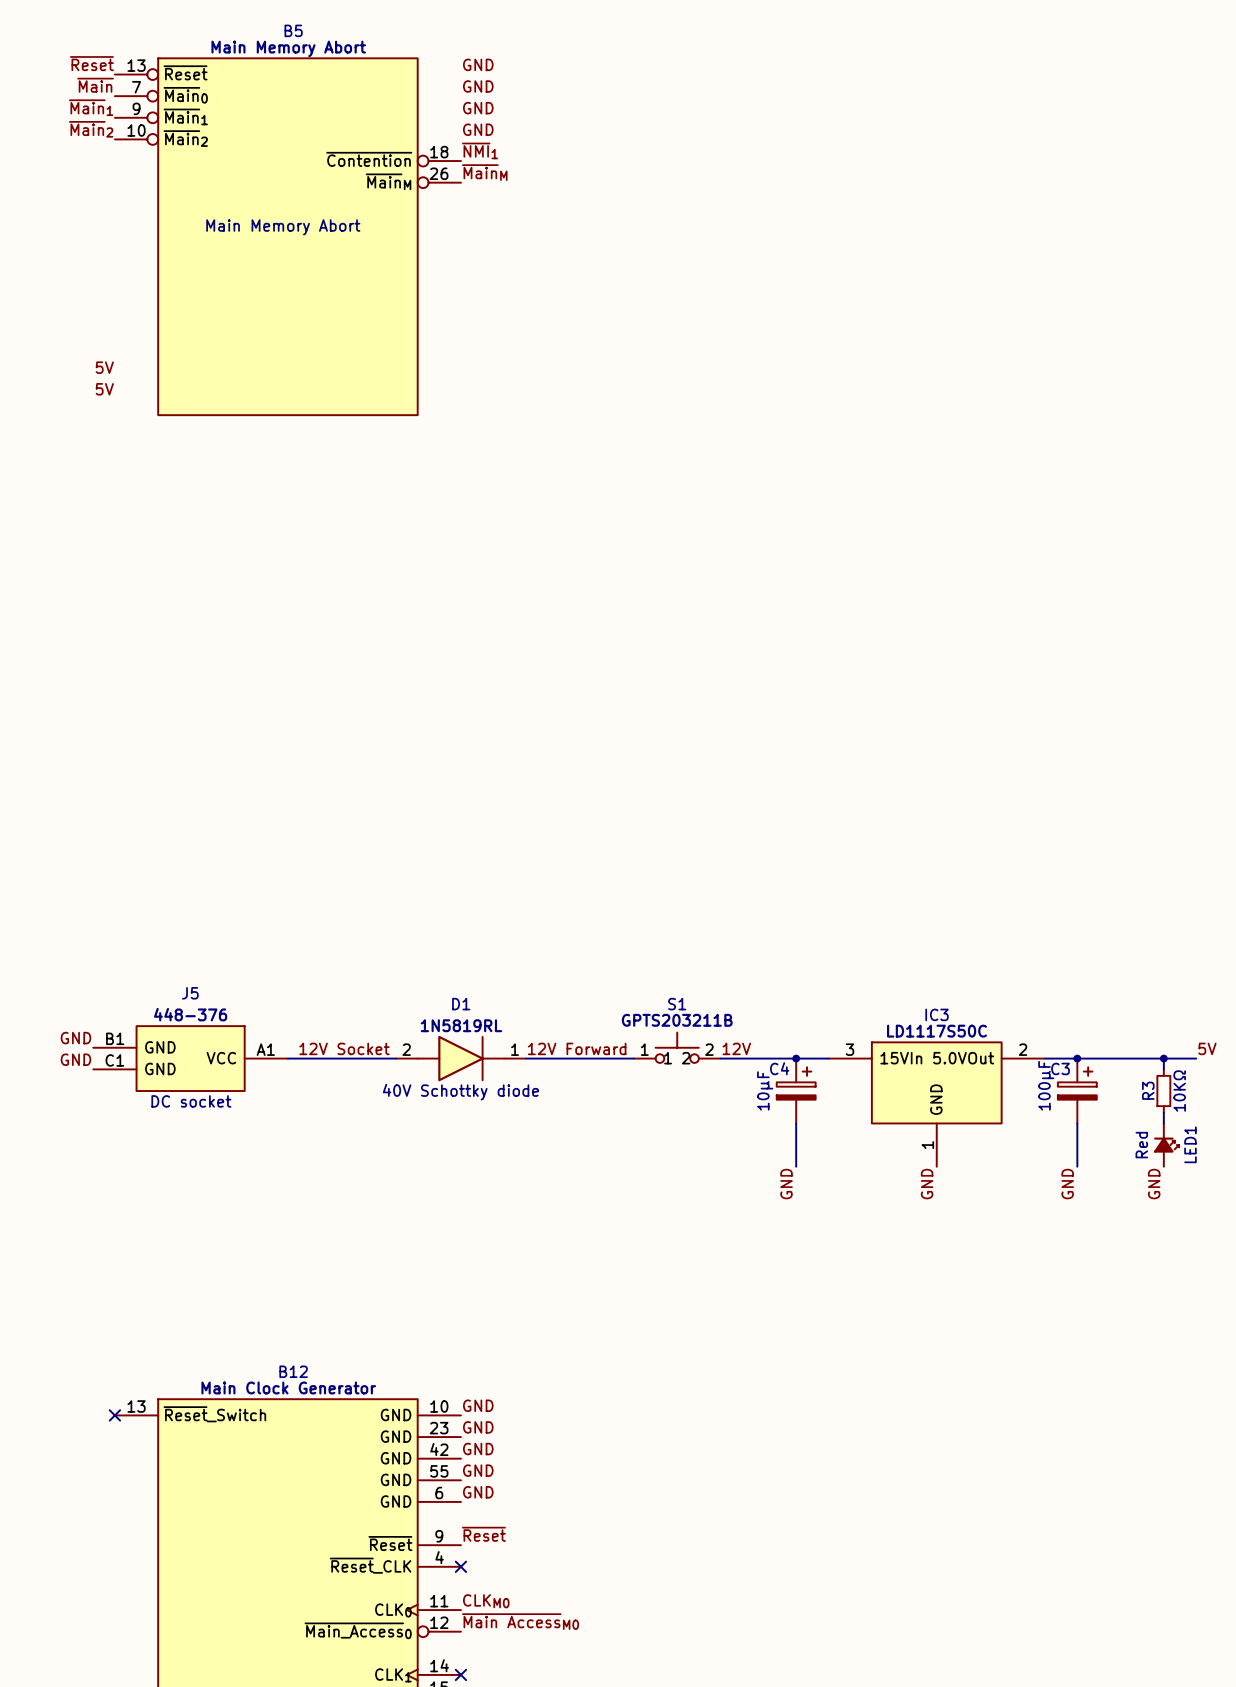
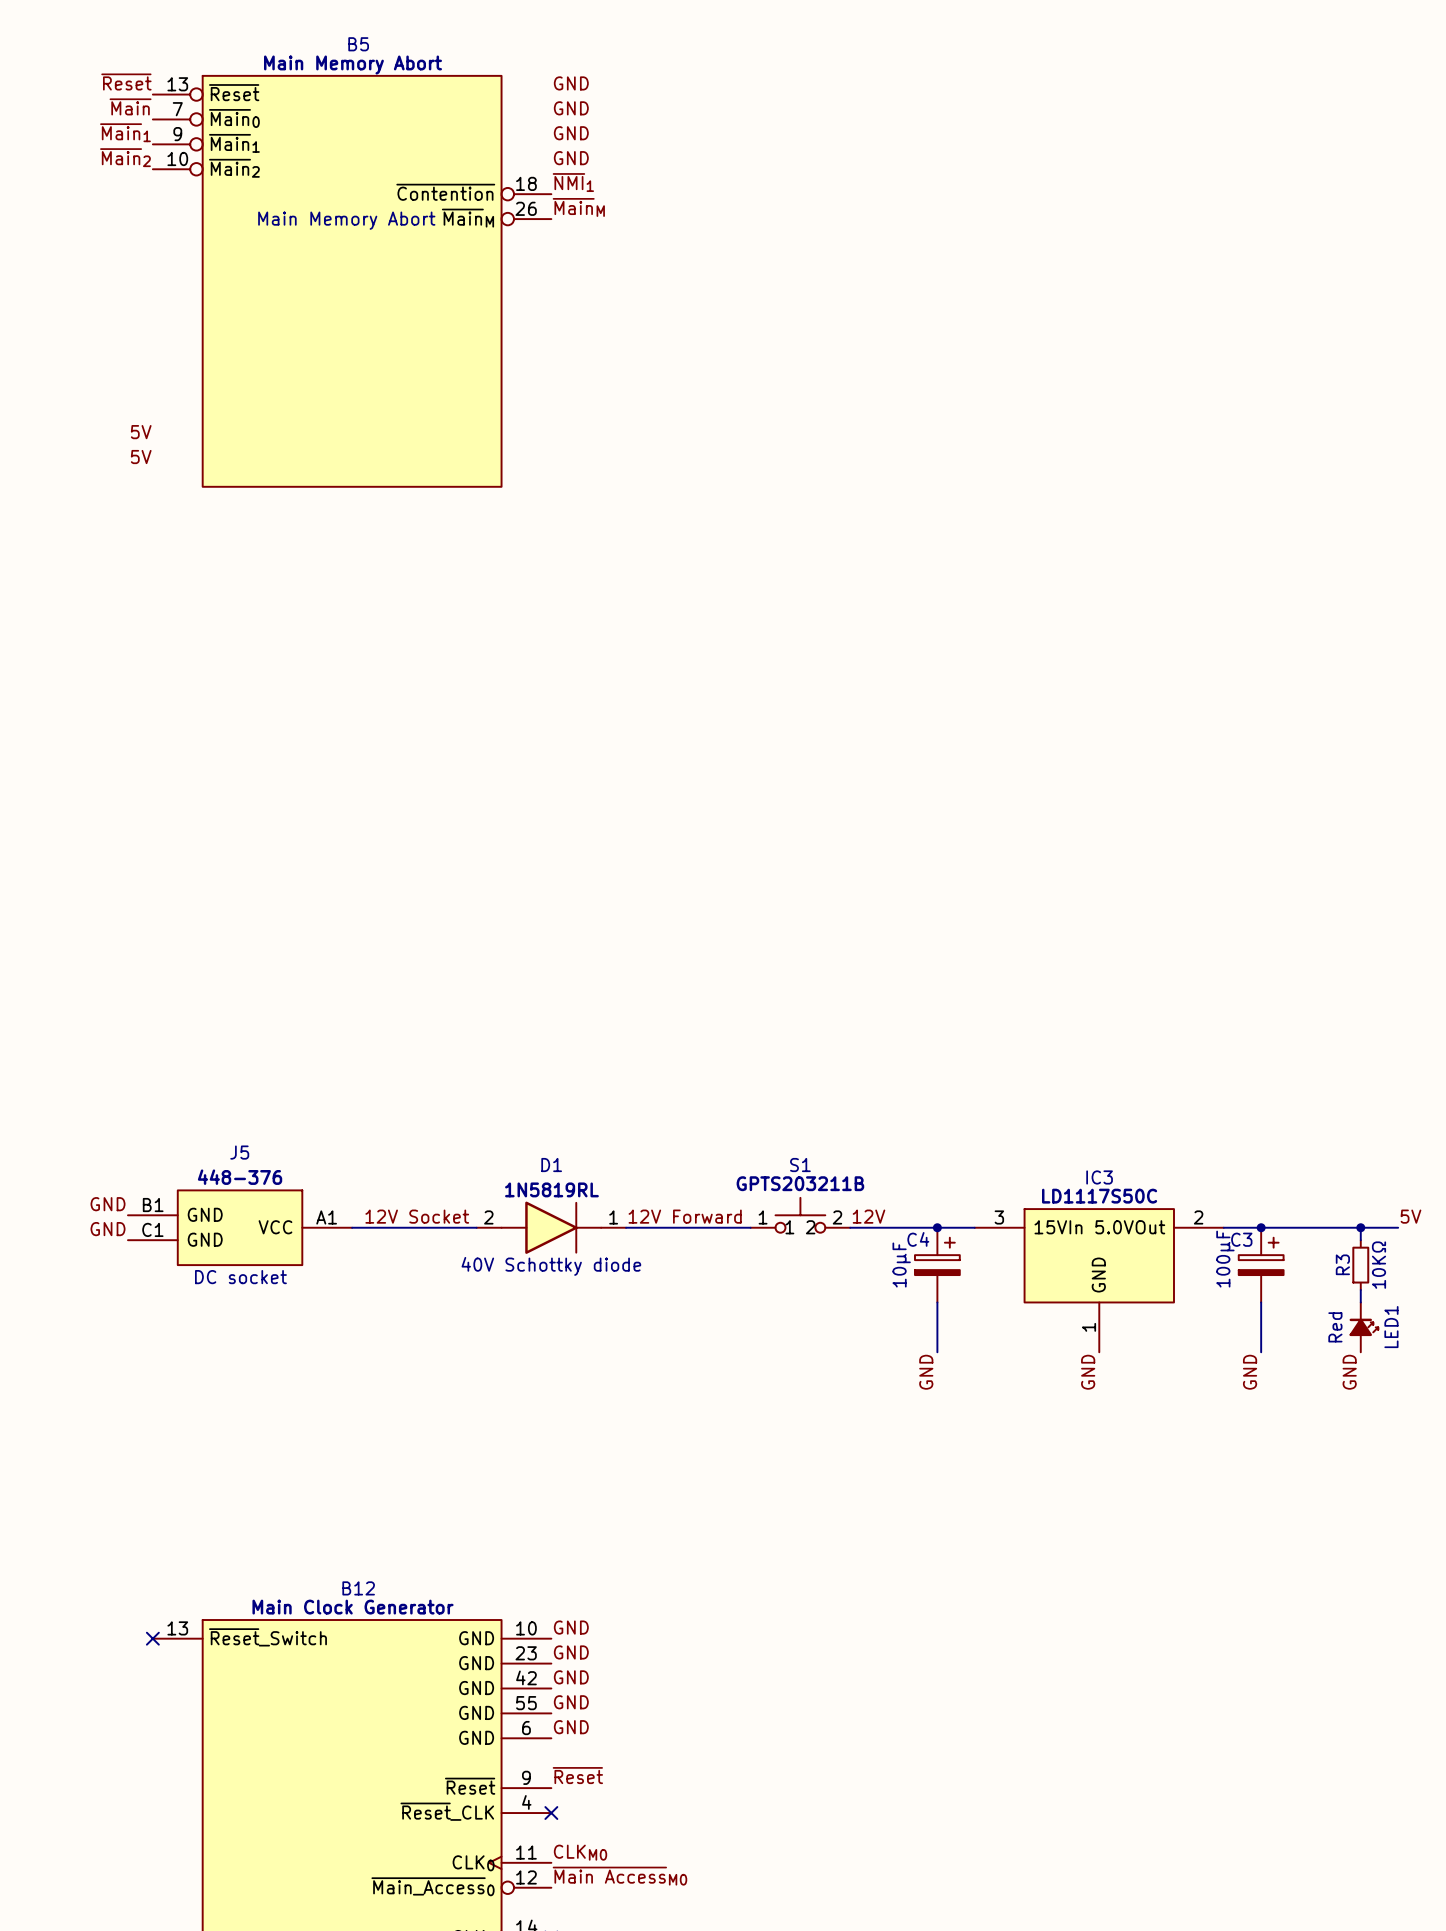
B5 text position: Main Memory Abort (283, 227) -> Main Memory Abort (346, 220)

